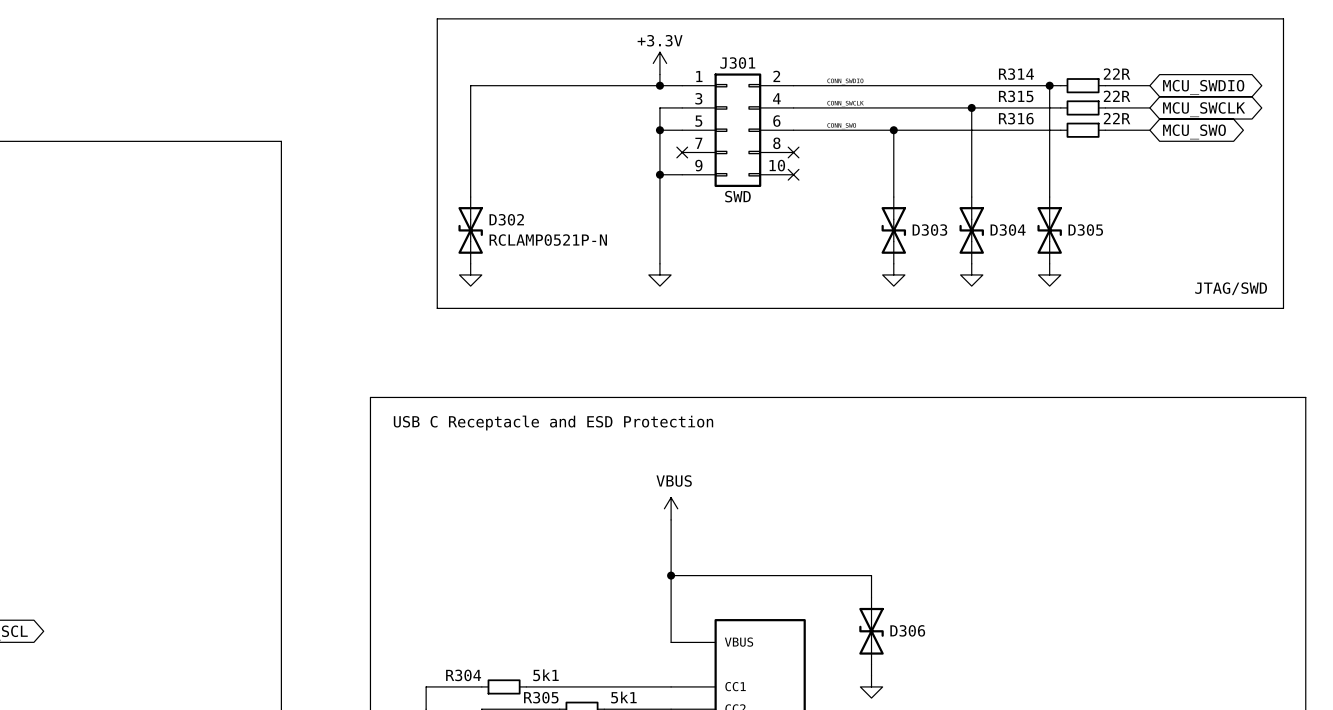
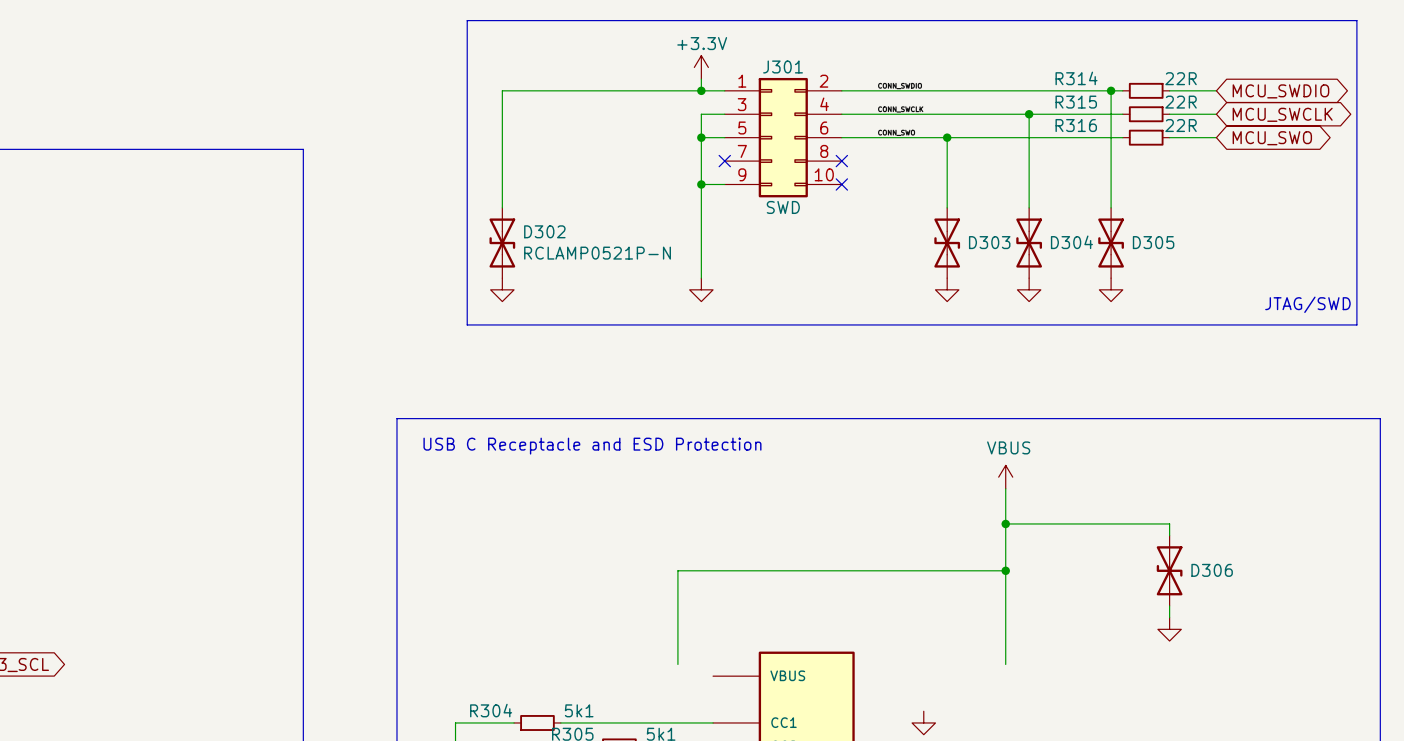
power symbol: none -> VBUS (1005, 477)
wire: none -> (1005, 488) (1005, 664)
wire: none -> (1005, 523) (1169, 523) (1169, 535)
junction: none -> (1005, 523)
power symbol: VBUS (671, 508) -> none
wire: (671, 519) (671, 642) -> none
wire: none -> (1005, 570) (677, 570) (677, 664)
junction: none -> (1005, 570)
wire: (671, 575) (871, 575) (871, 597) -> none
junction: (671, 575) -> none
wire: none -> (1169, 605) (1169, 617)
power symbol: none -> (1169, 629)
D306 position: (871, 631) -> (1169, 570)
wire: (871, 664) (871, 675) -> none

